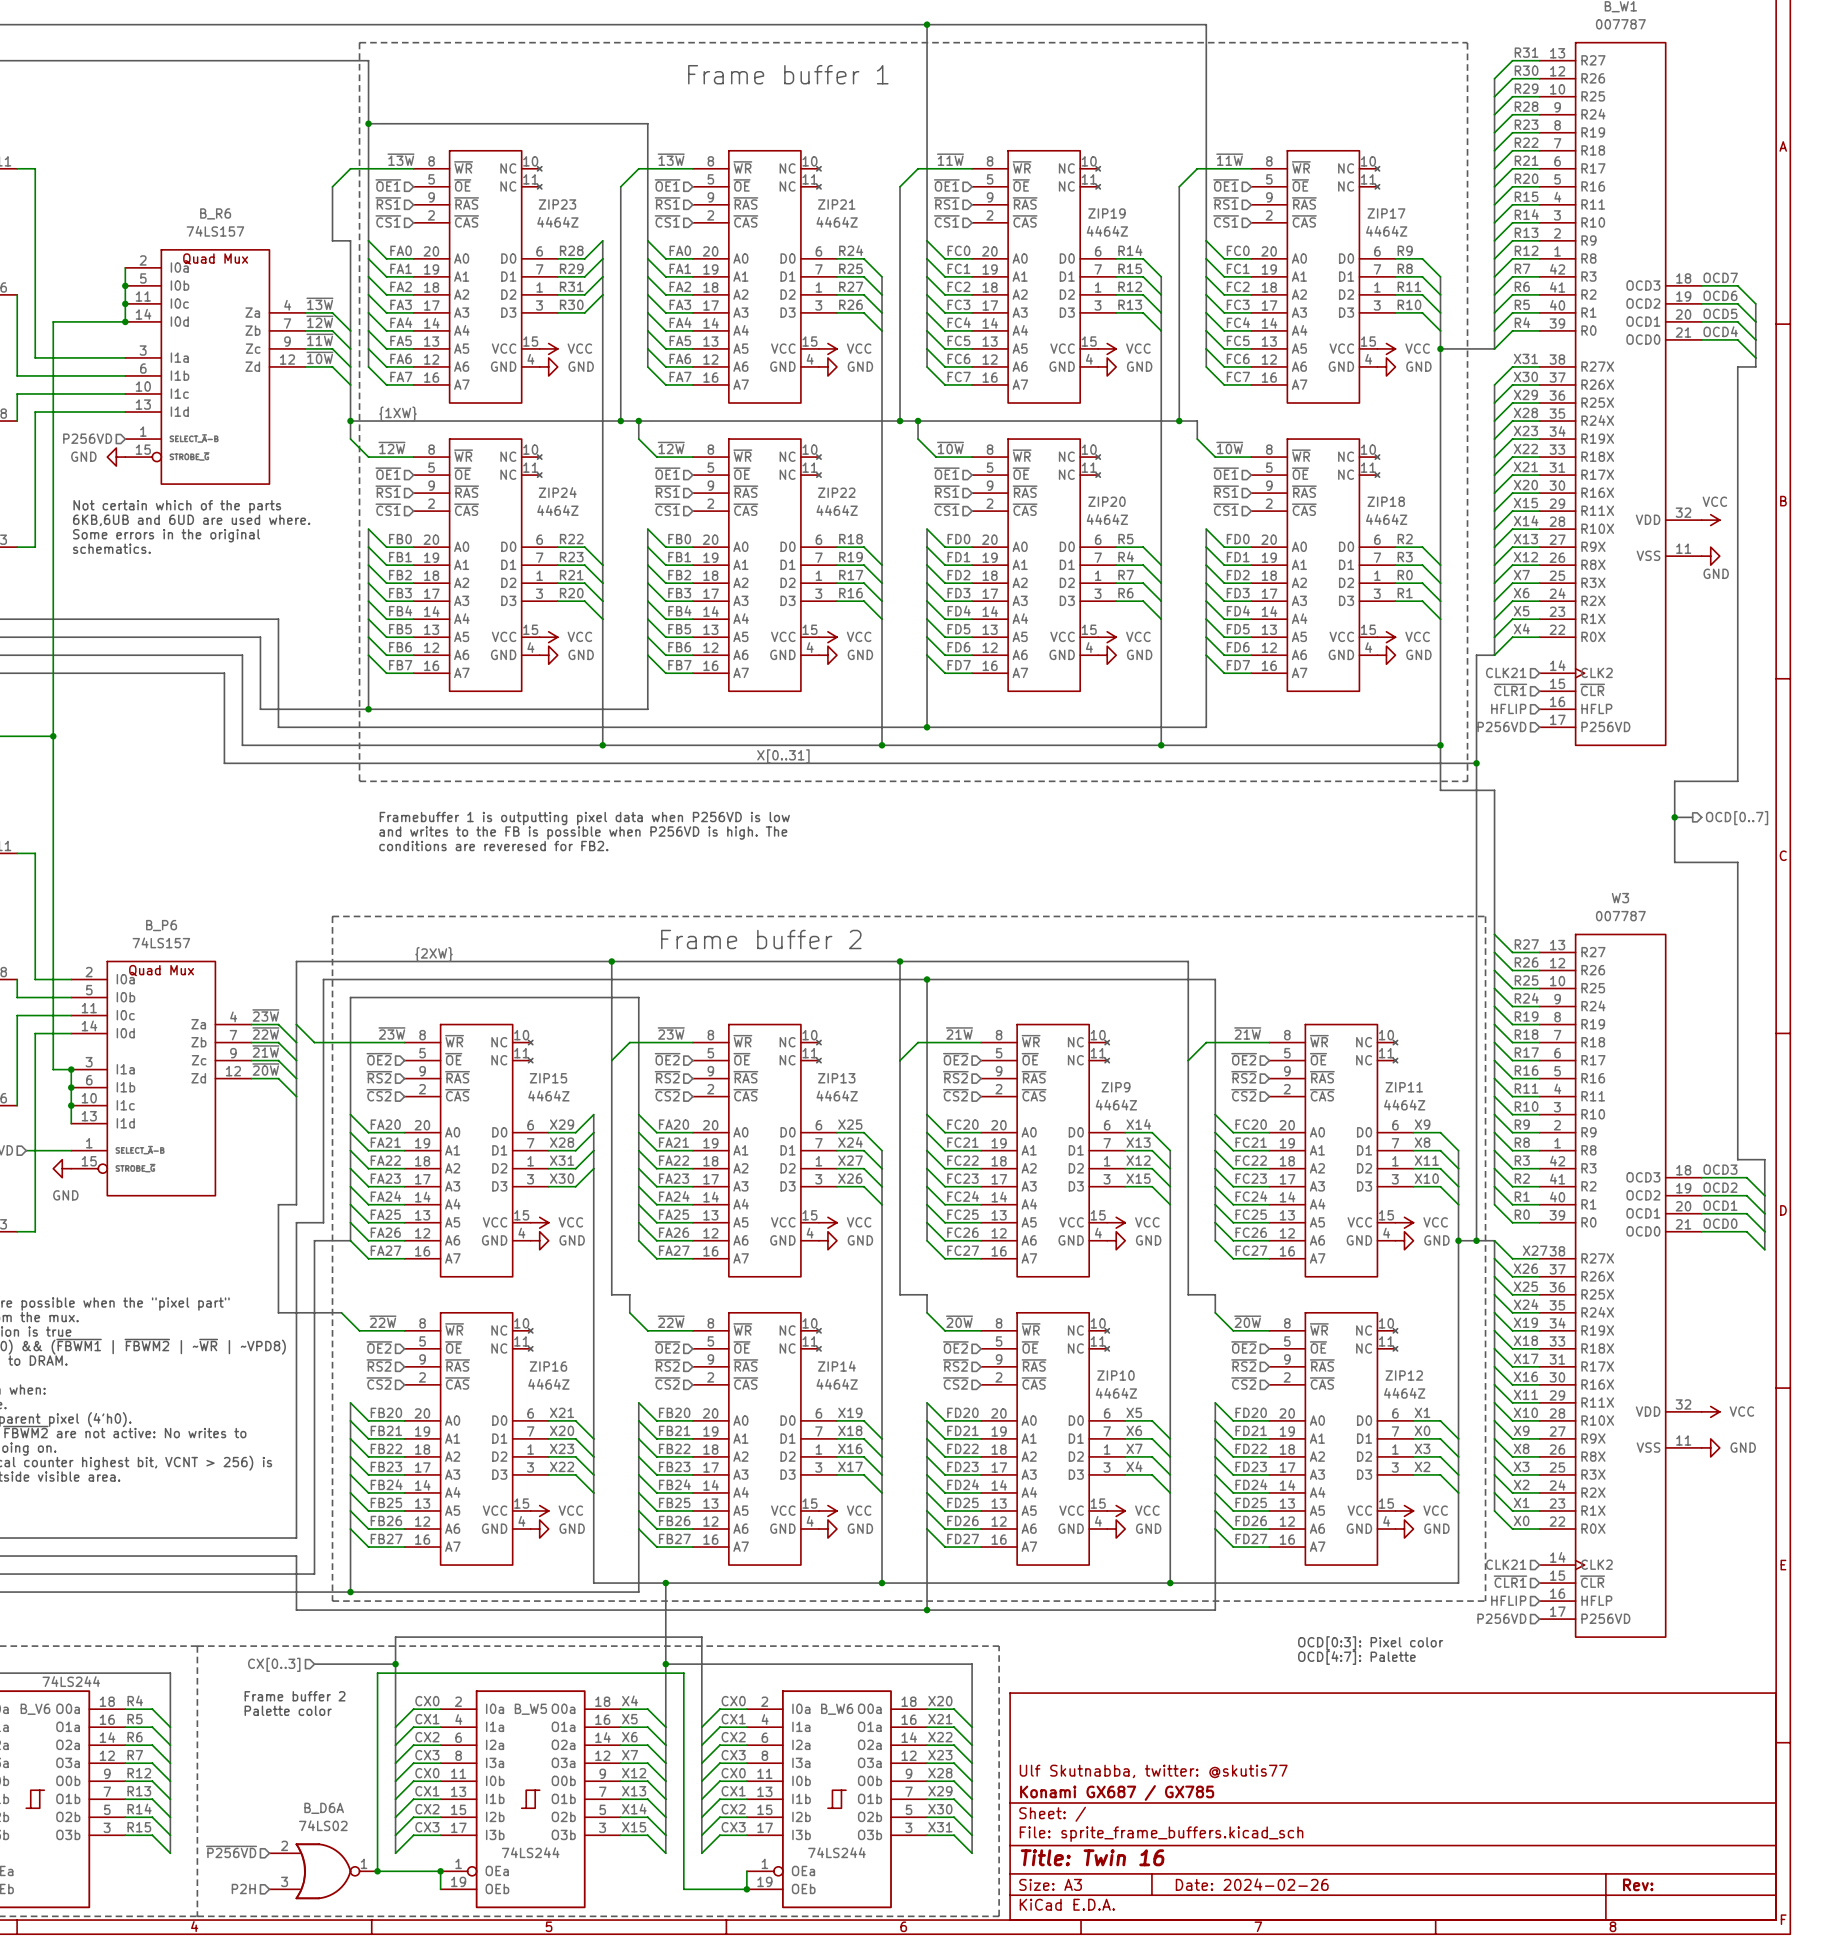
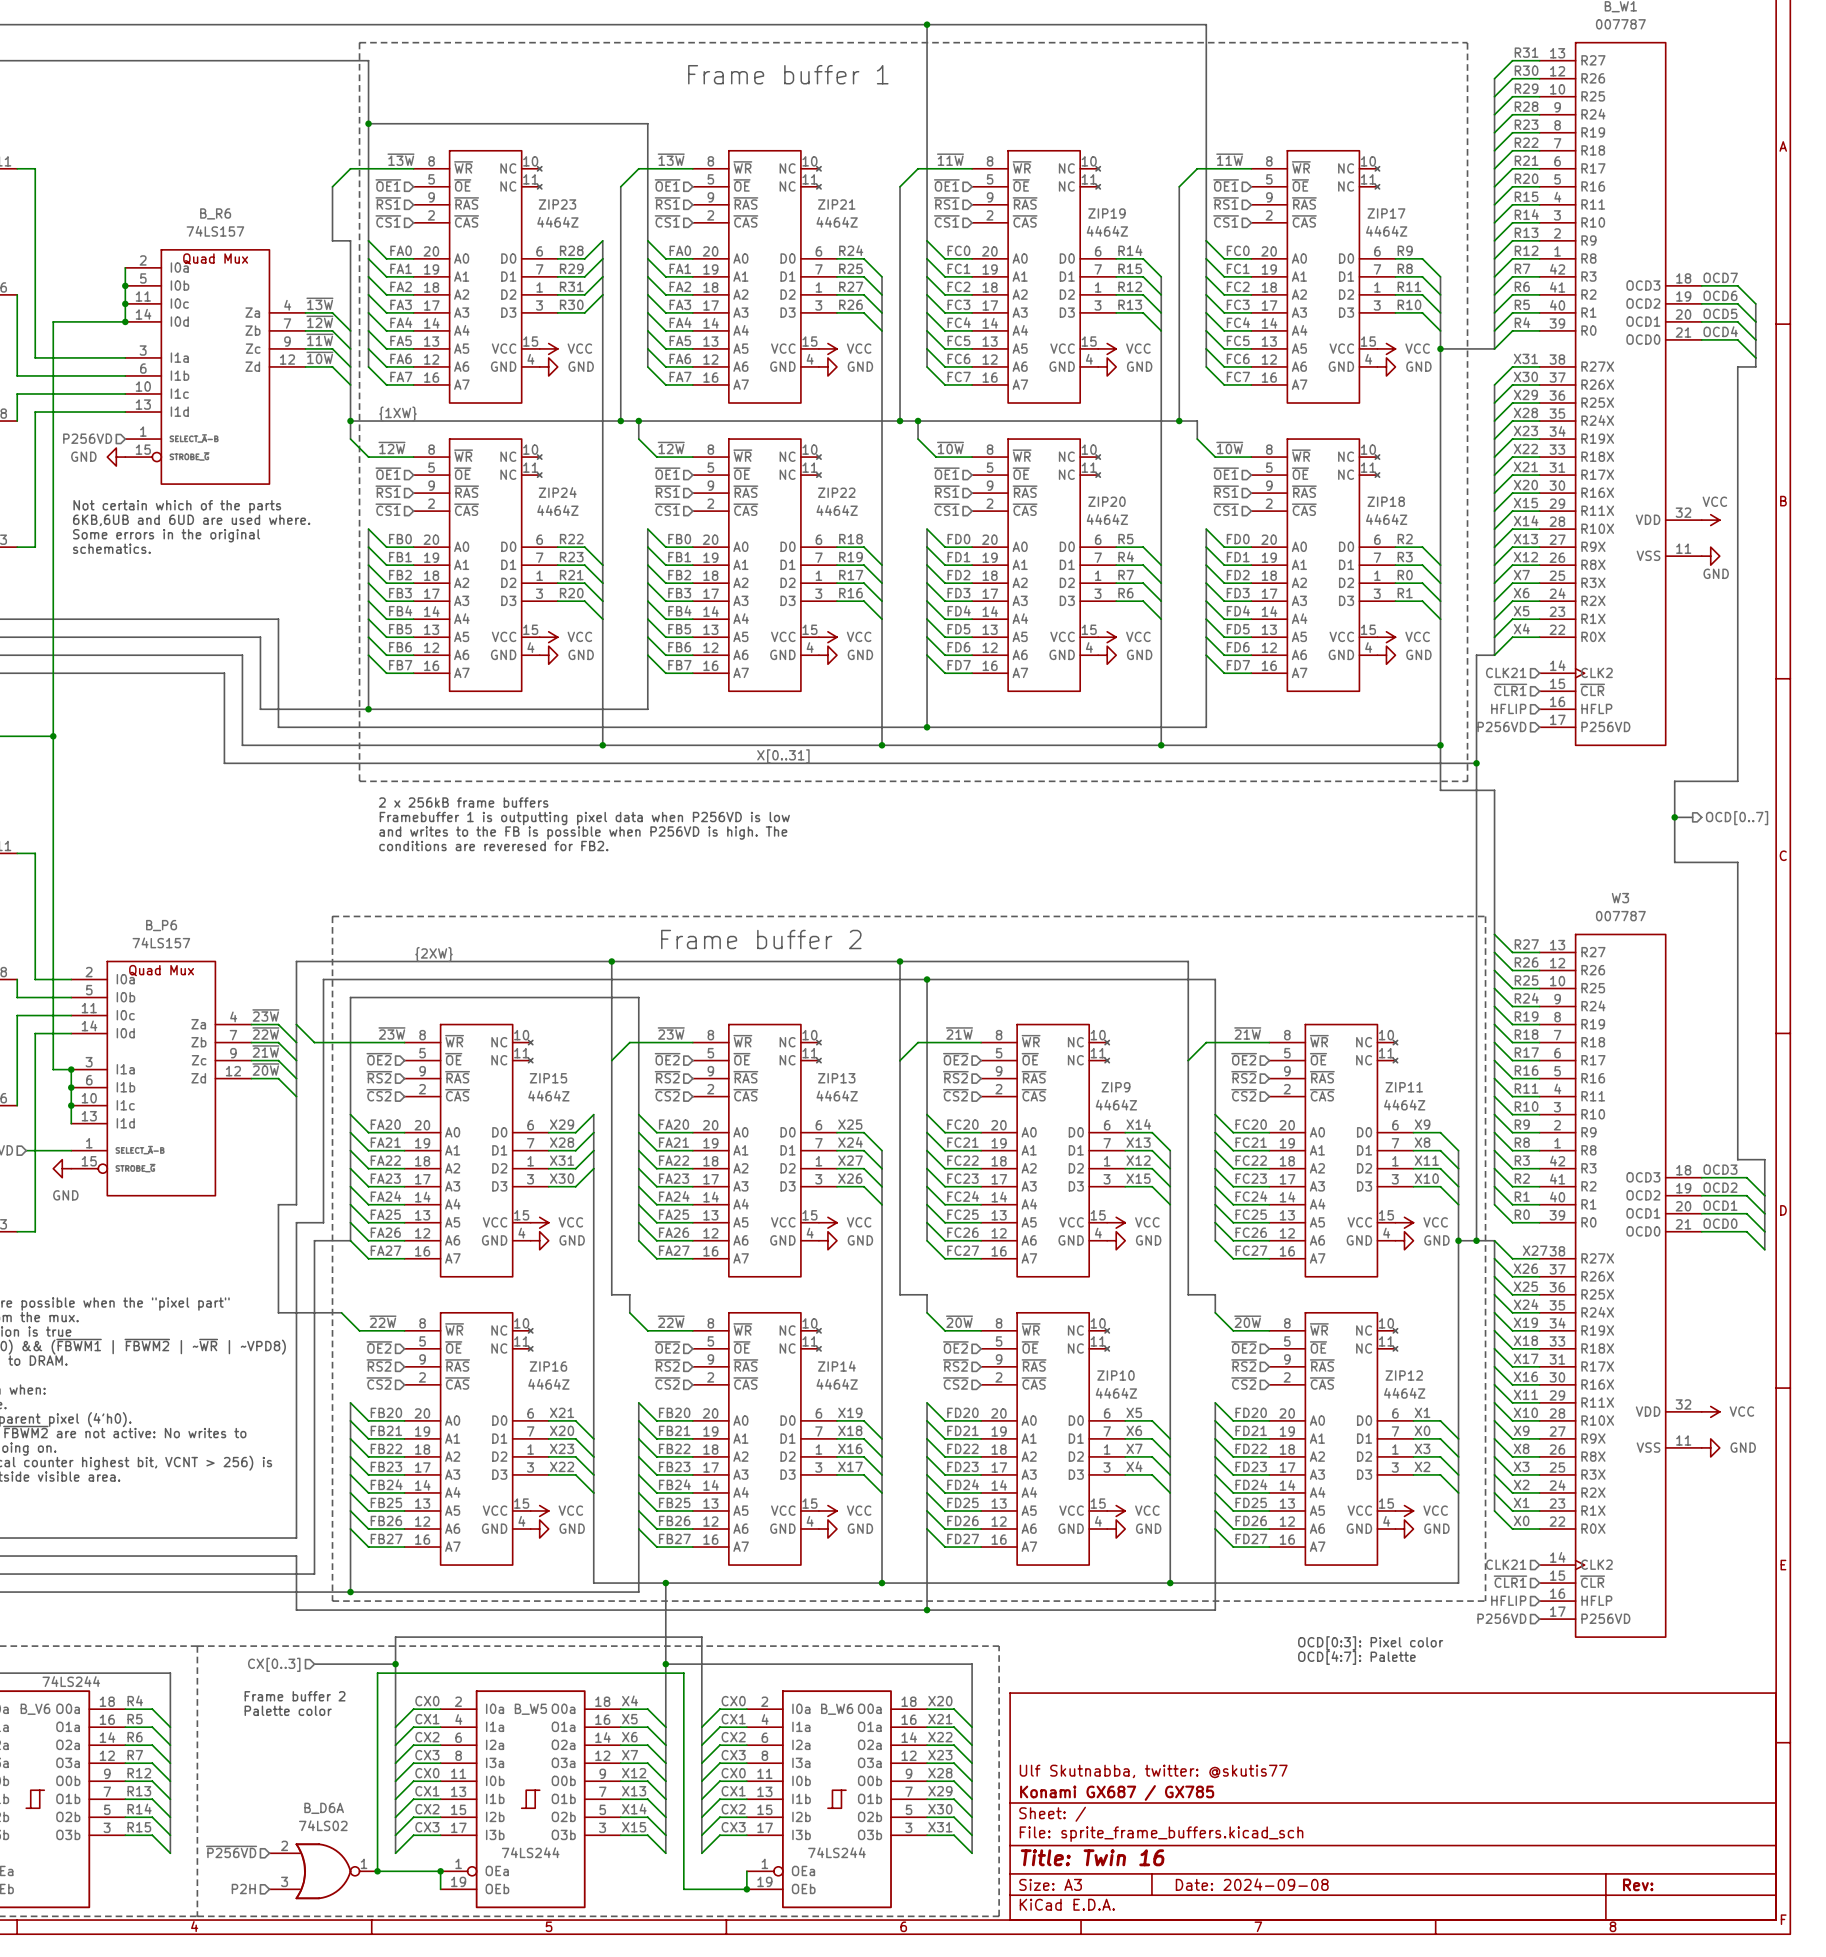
text: none -> 2 x 256kB frame buffers (463, 802)
title block: Date: 2024-02-26 (1252, 1884) -> Date: 2024-09-08 (1252, 1884)

